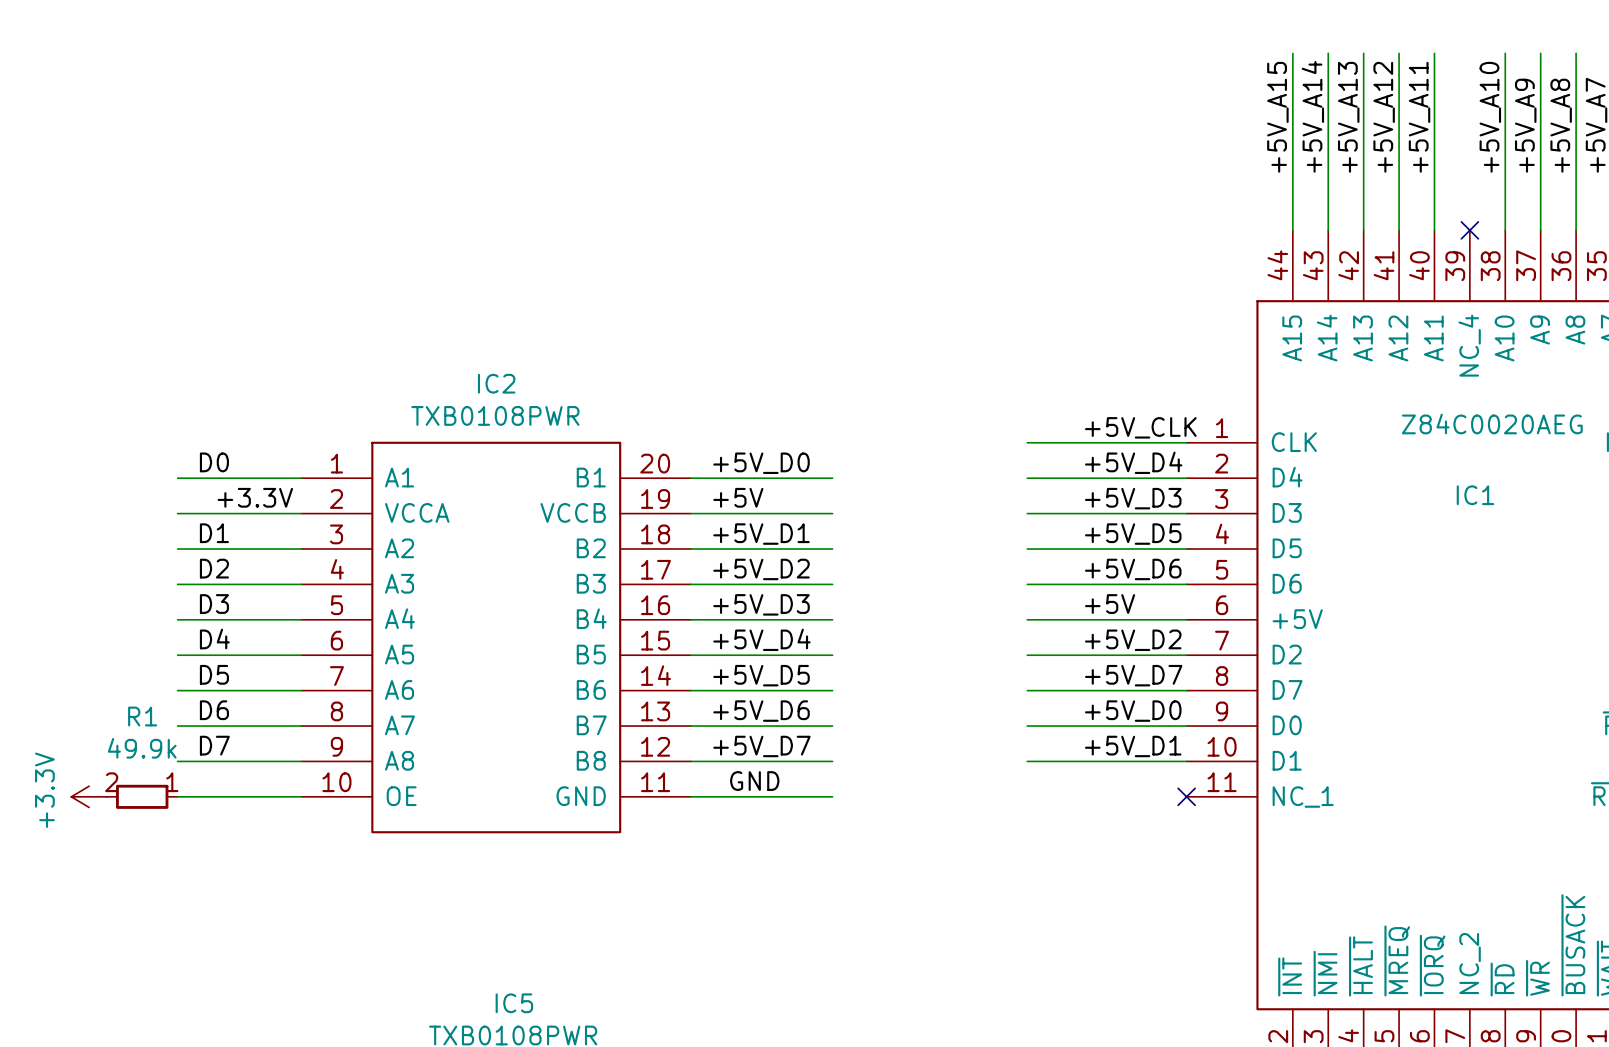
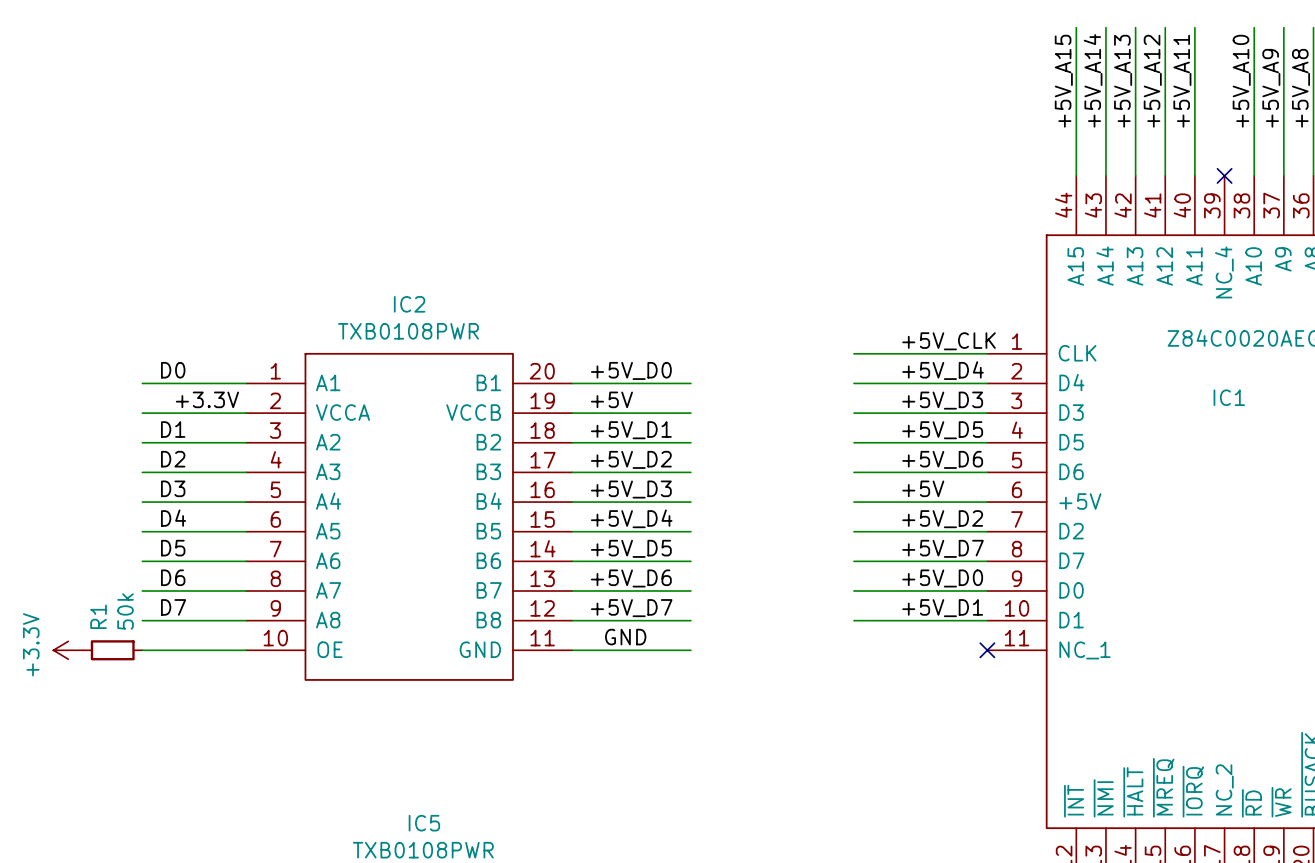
R1 name rotation: 0° (142, 716) -> 90° counterclockwise (98, 616)
R1 value: 49.9k (142, 748) -> 50k (125, 611)
R1 pin number: 2 (111, 782) -> none
R1 pin number: 1 (172, 782) -> none

